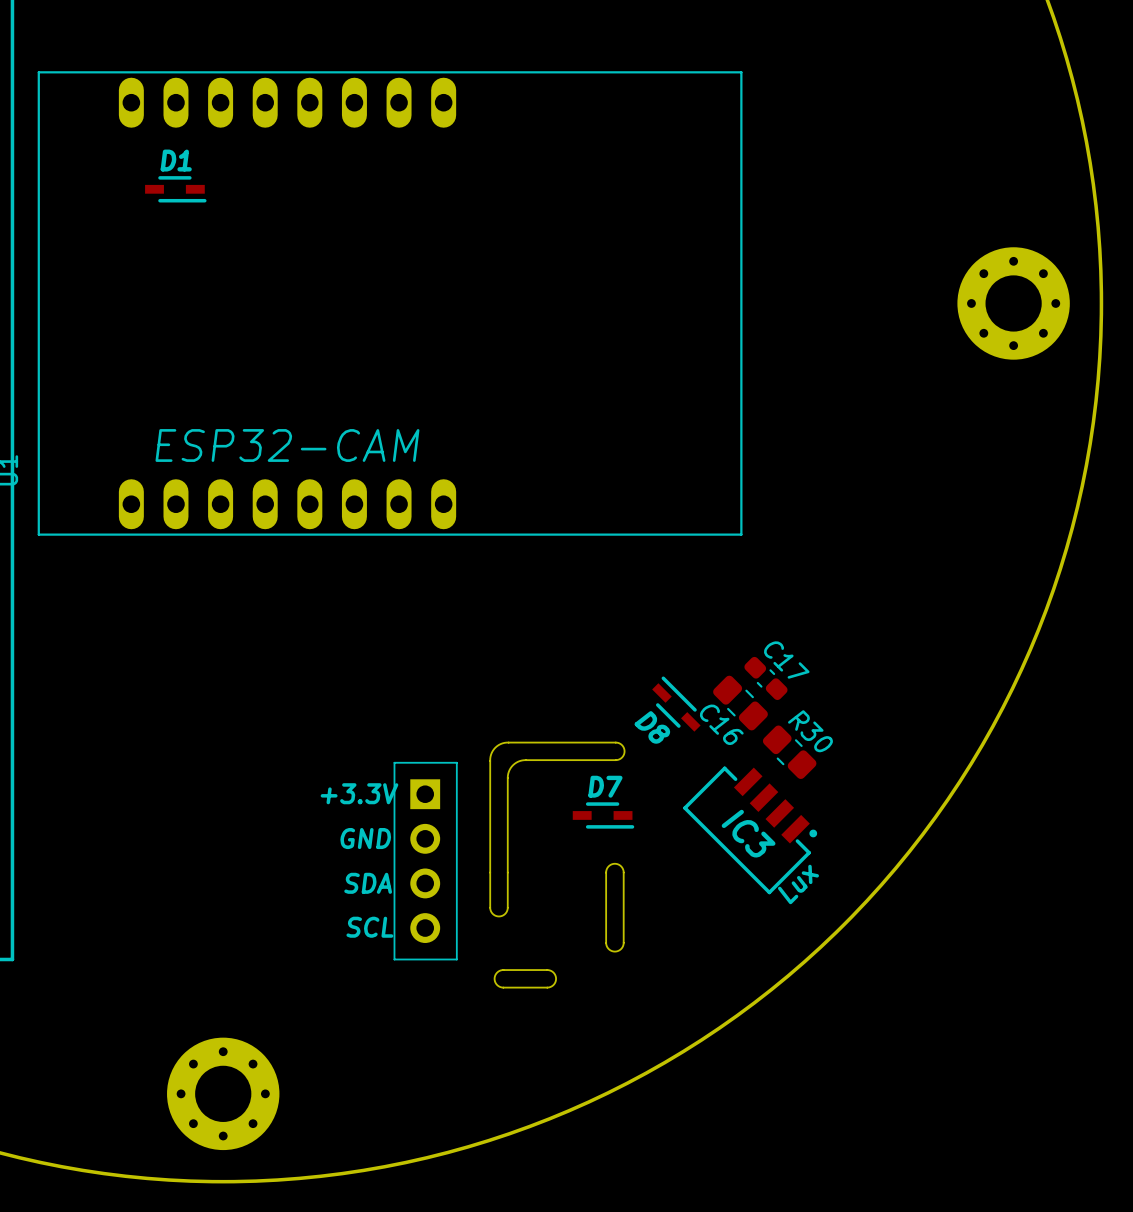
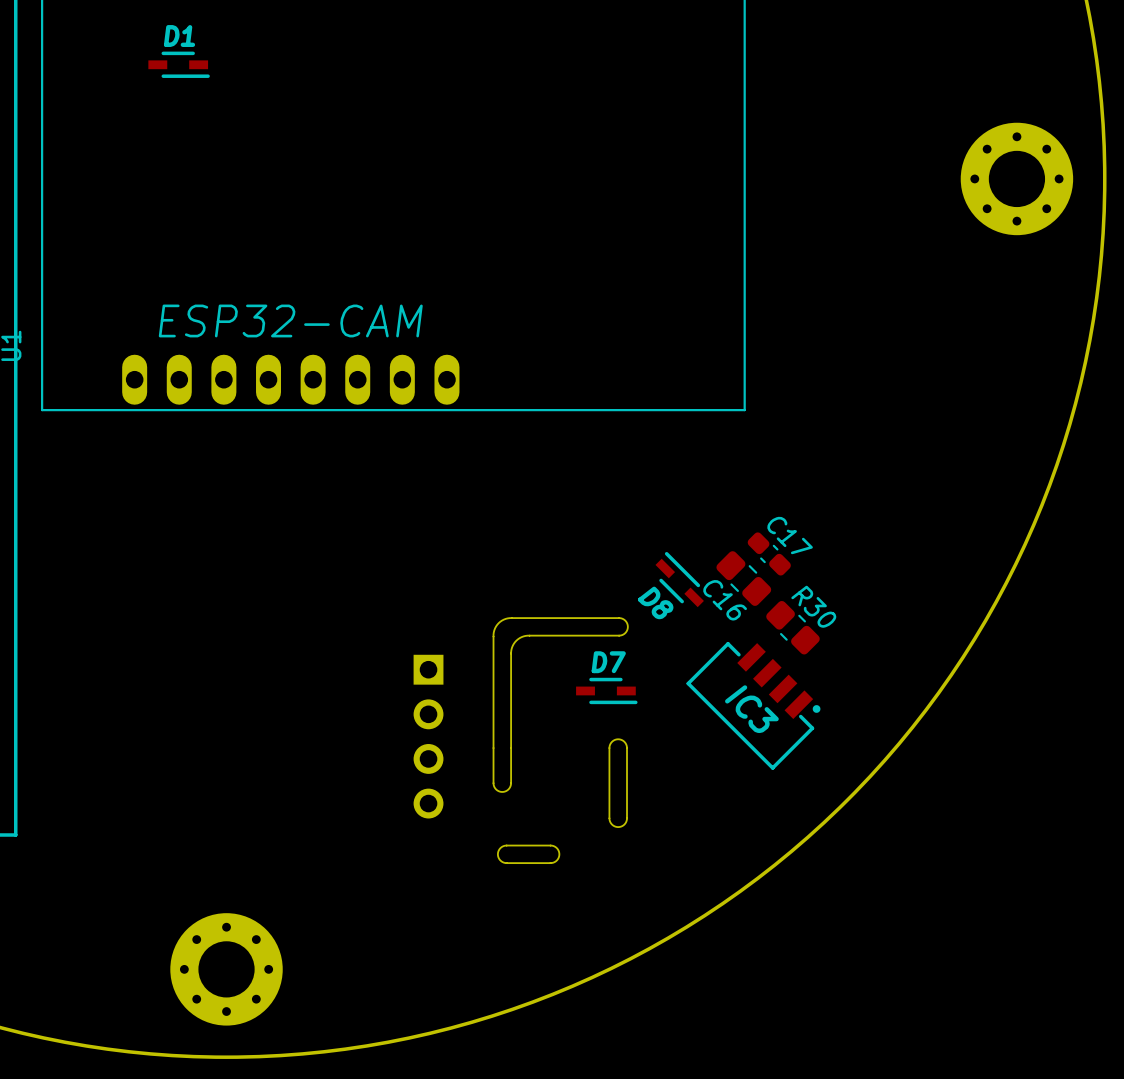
line: (394, 762) (456, 762) (456, 959) (394, 959) (394, 762) -> none
text: +3.3V (359, 793) -> none
text: GND (365, 838) -> none
text: SDA (368, 883) -> none
text: Lux (798, 884) -> none
text: SCL (369, 927) -> none

